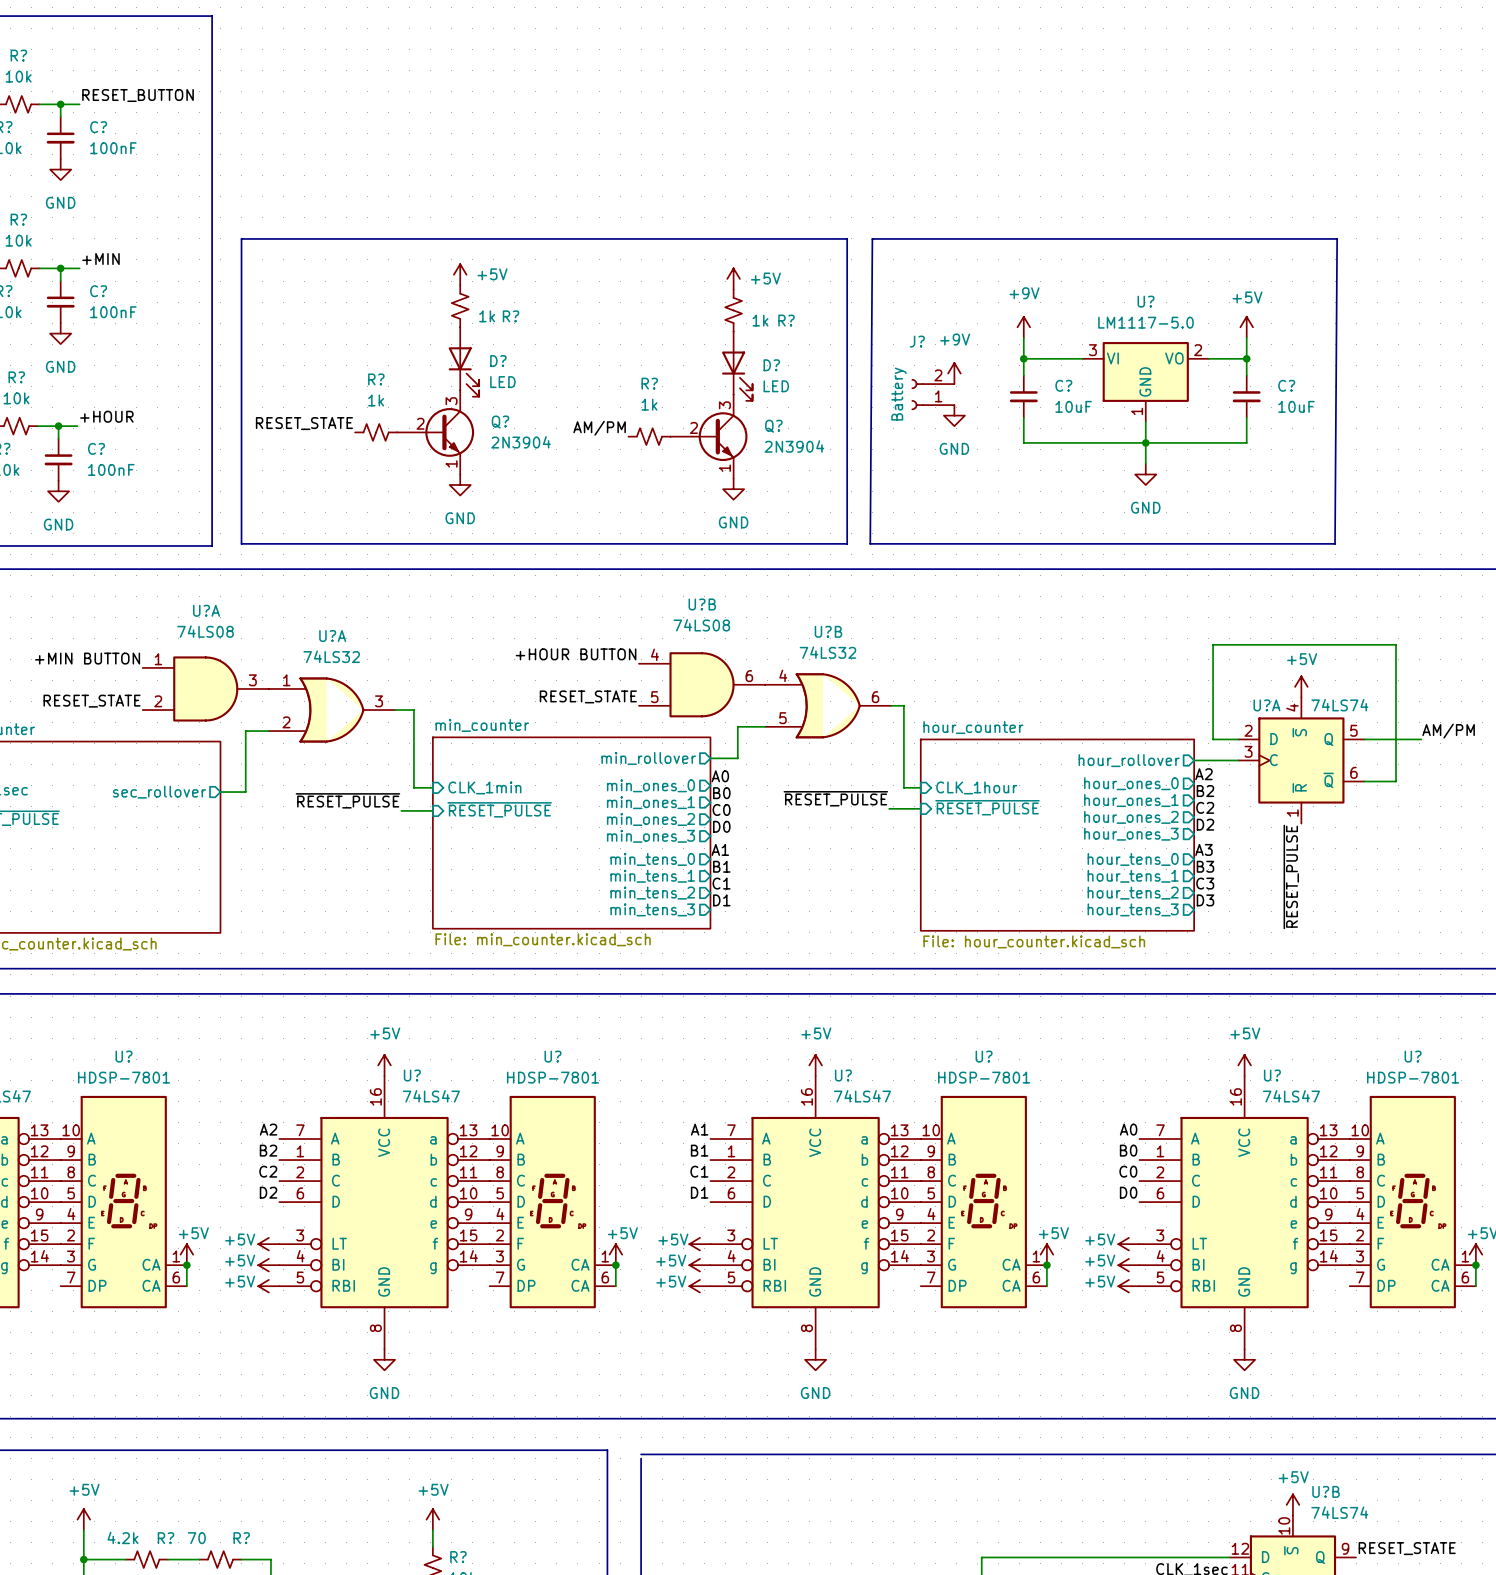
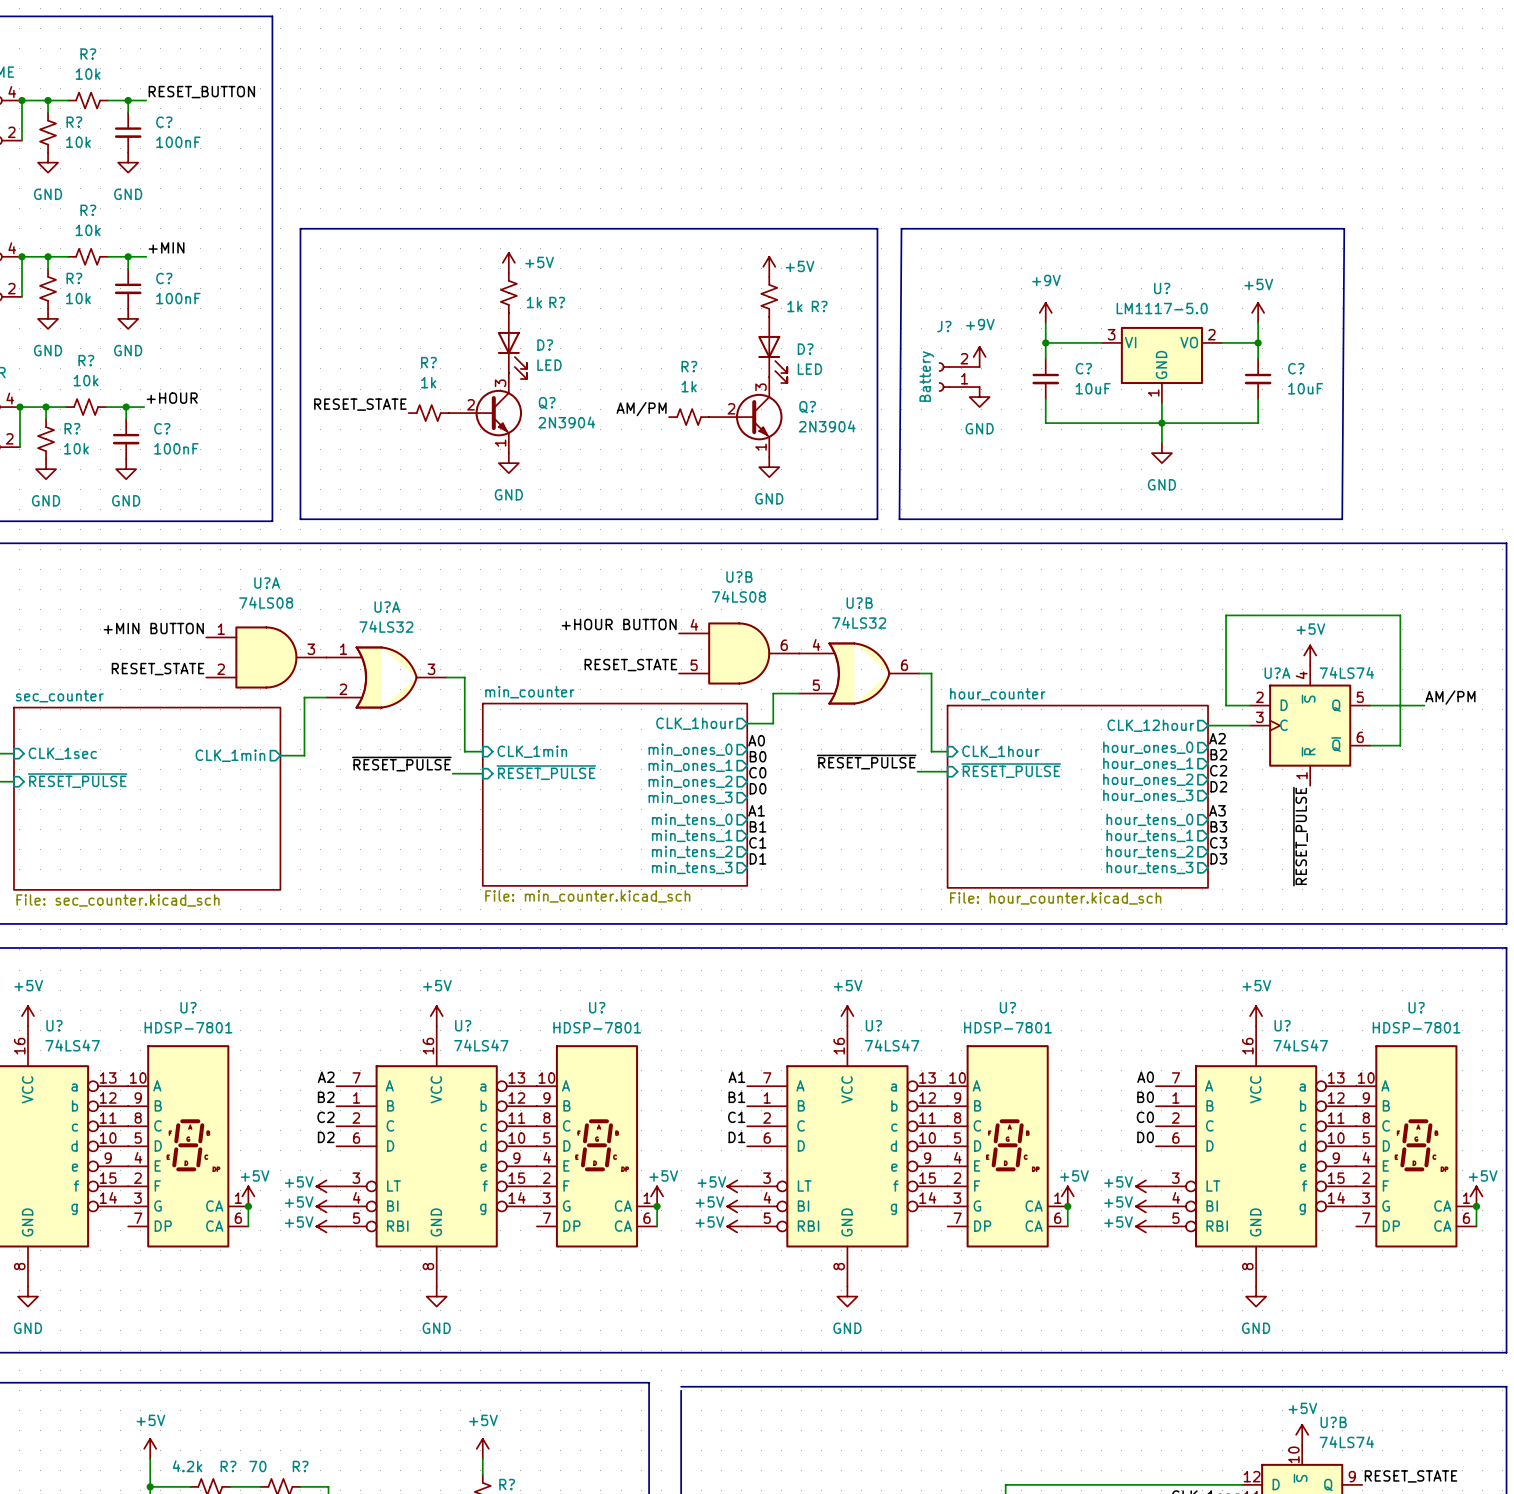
sheet pin: min_rollover (648, 758) -> CLK_1hour (694, 723)
sheet pin: hour_rollover (1129, 760) -> CLK_12hour (1150, 725)
sheet pin: sec_rollover (159, 792) -> CLK_1min (230, 755)

